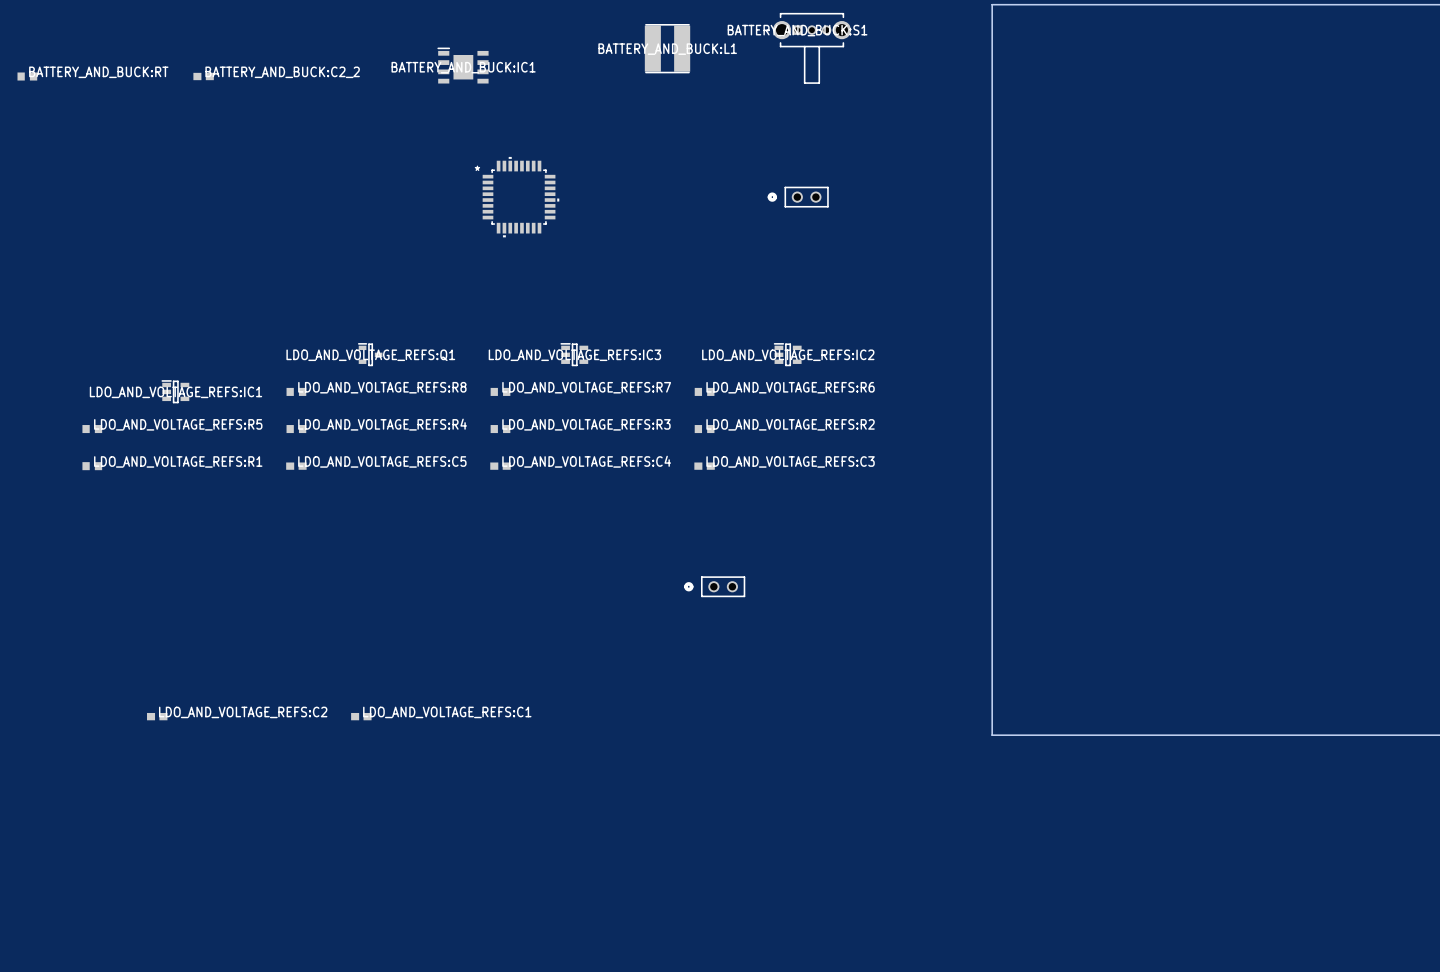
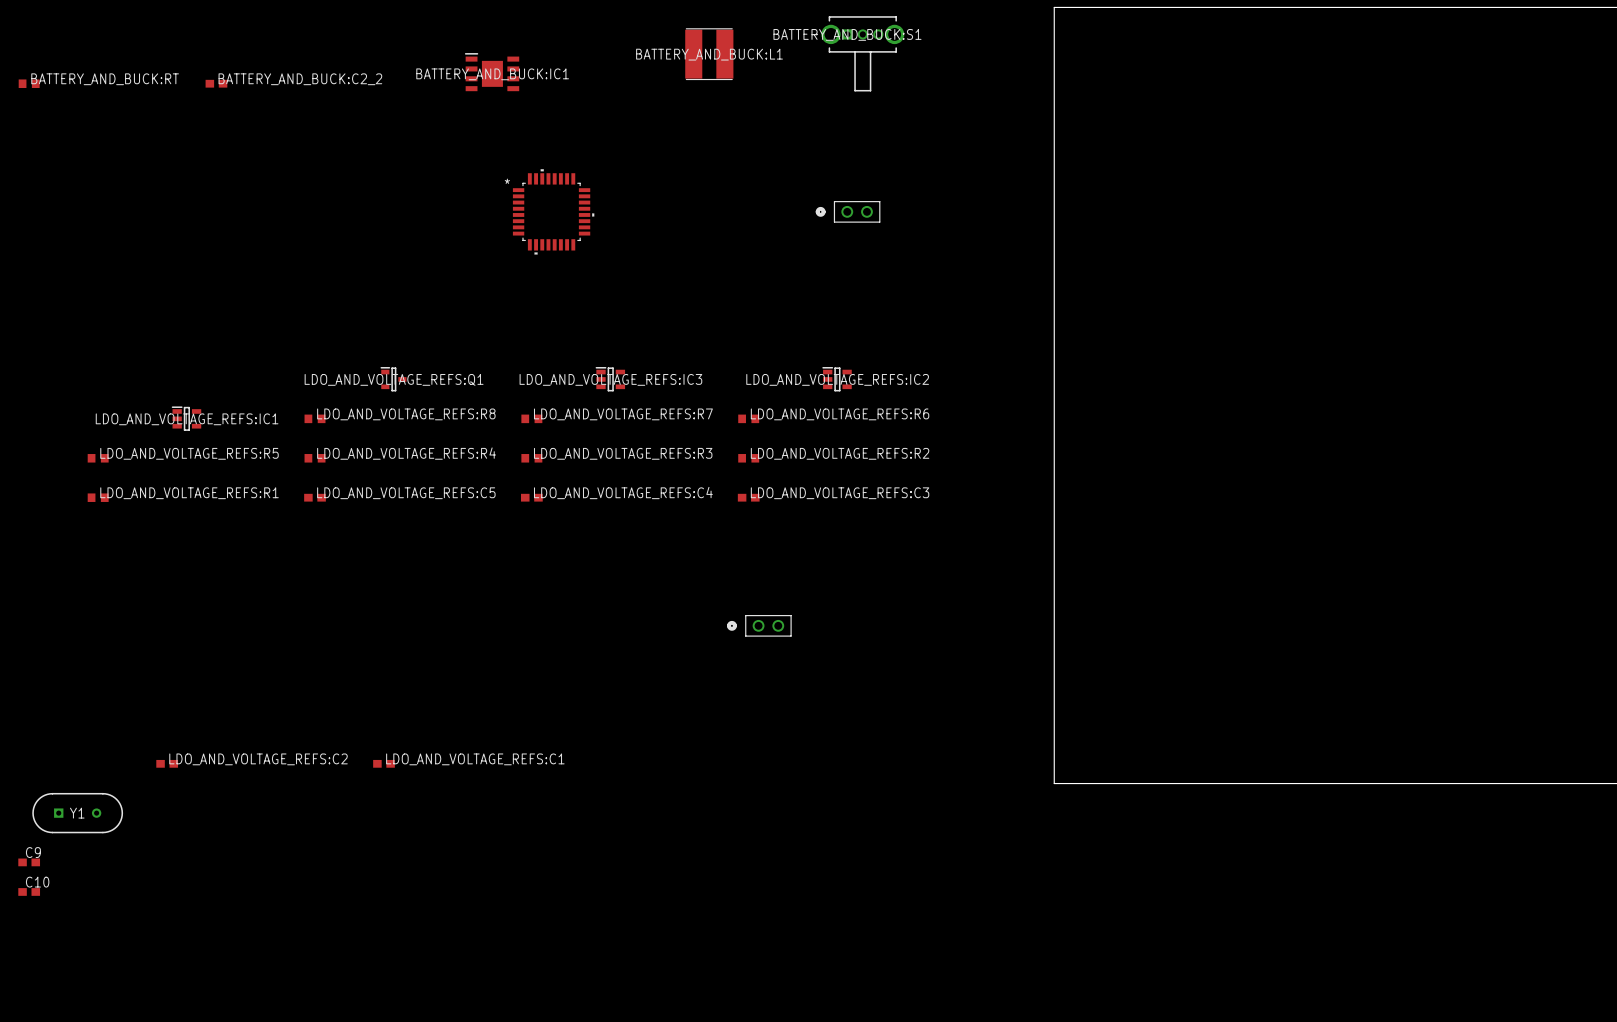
Y1: none -> (77, 813)
C9: none -> (29, 862)
C10: none -> (29, 891)

